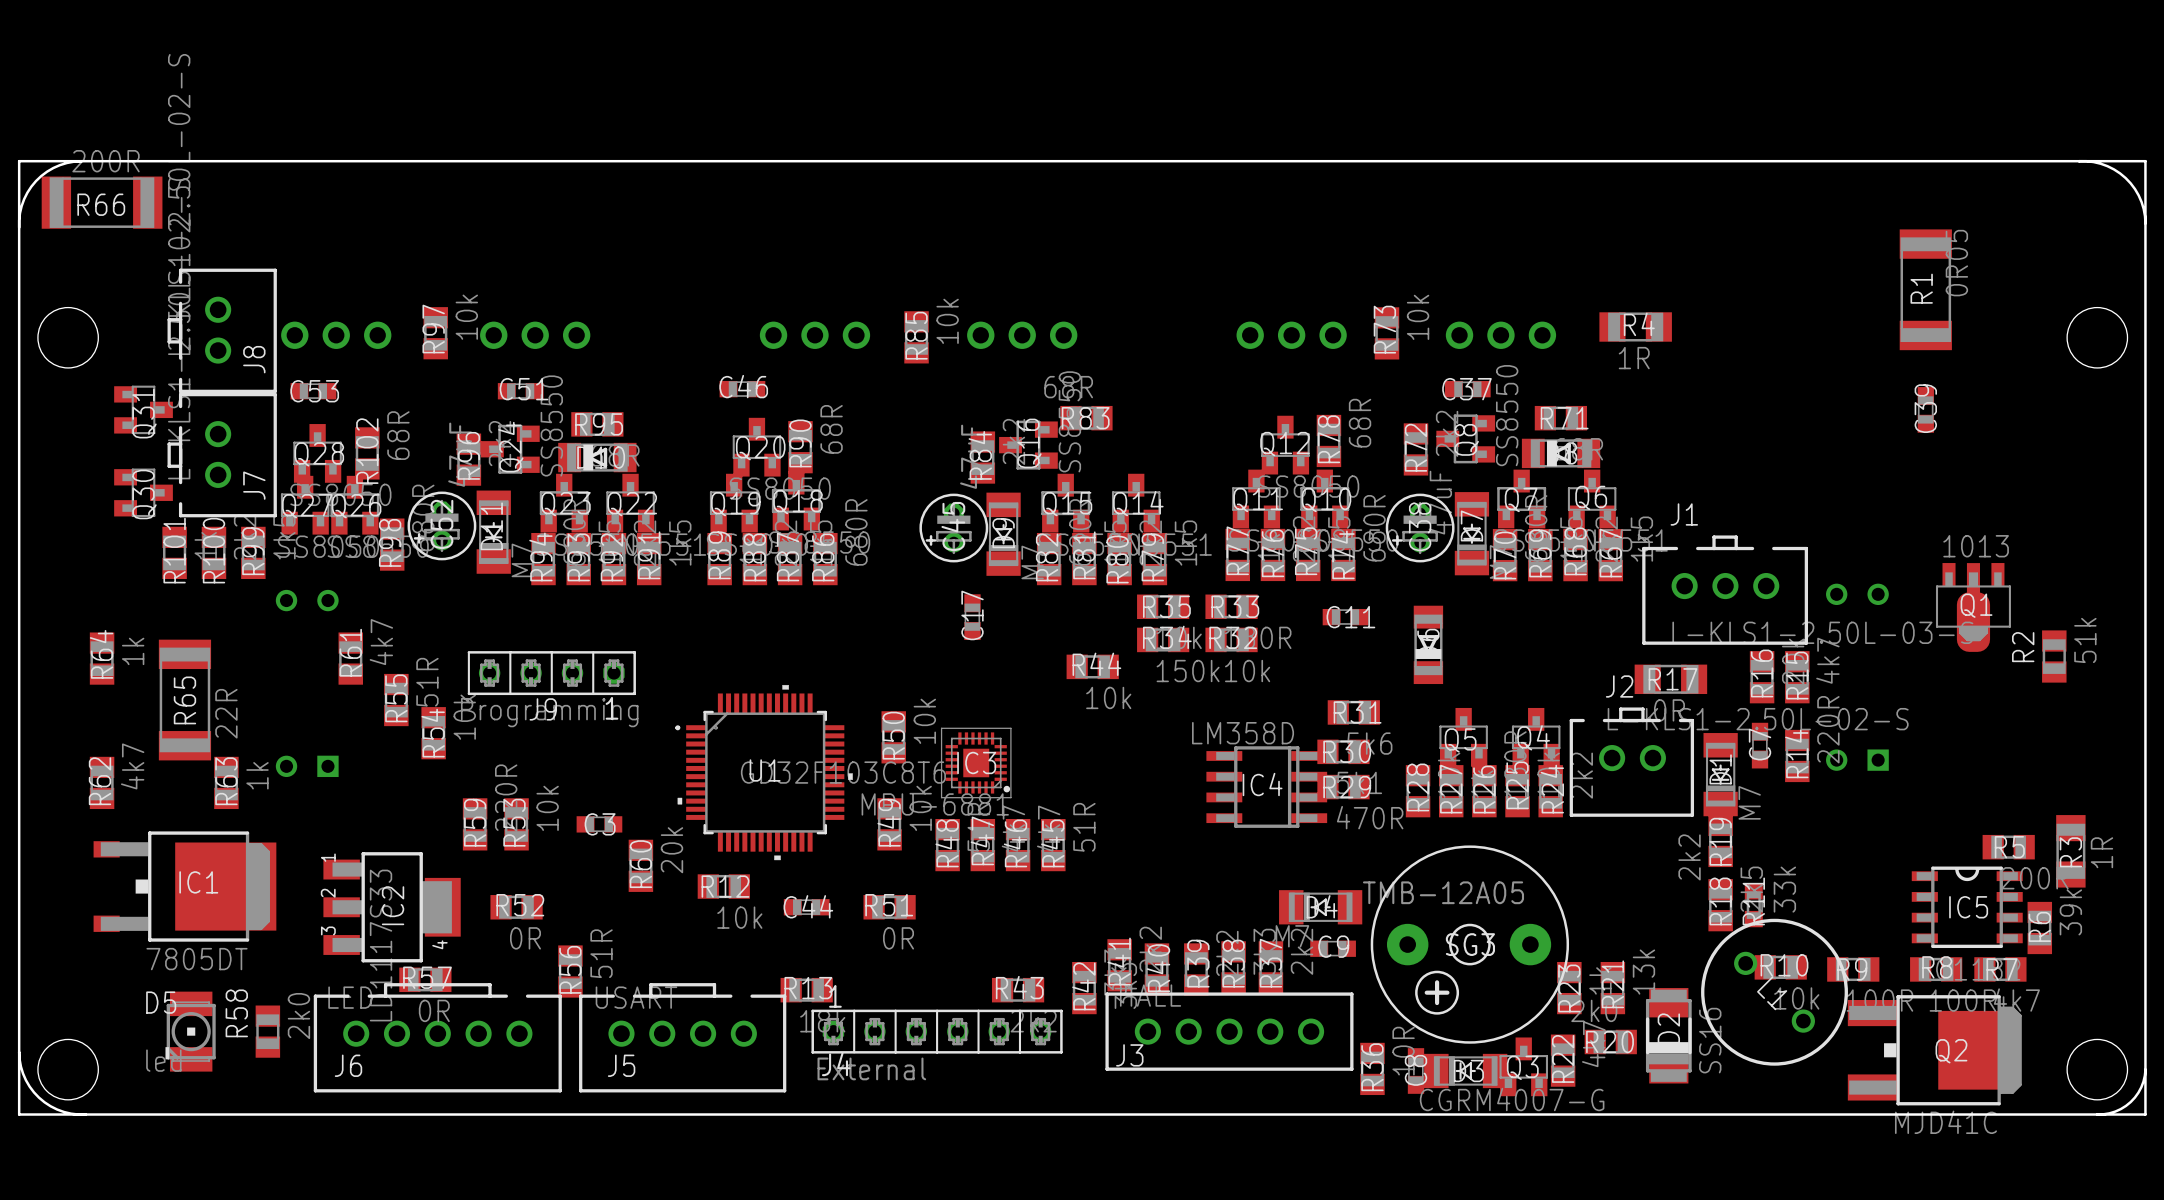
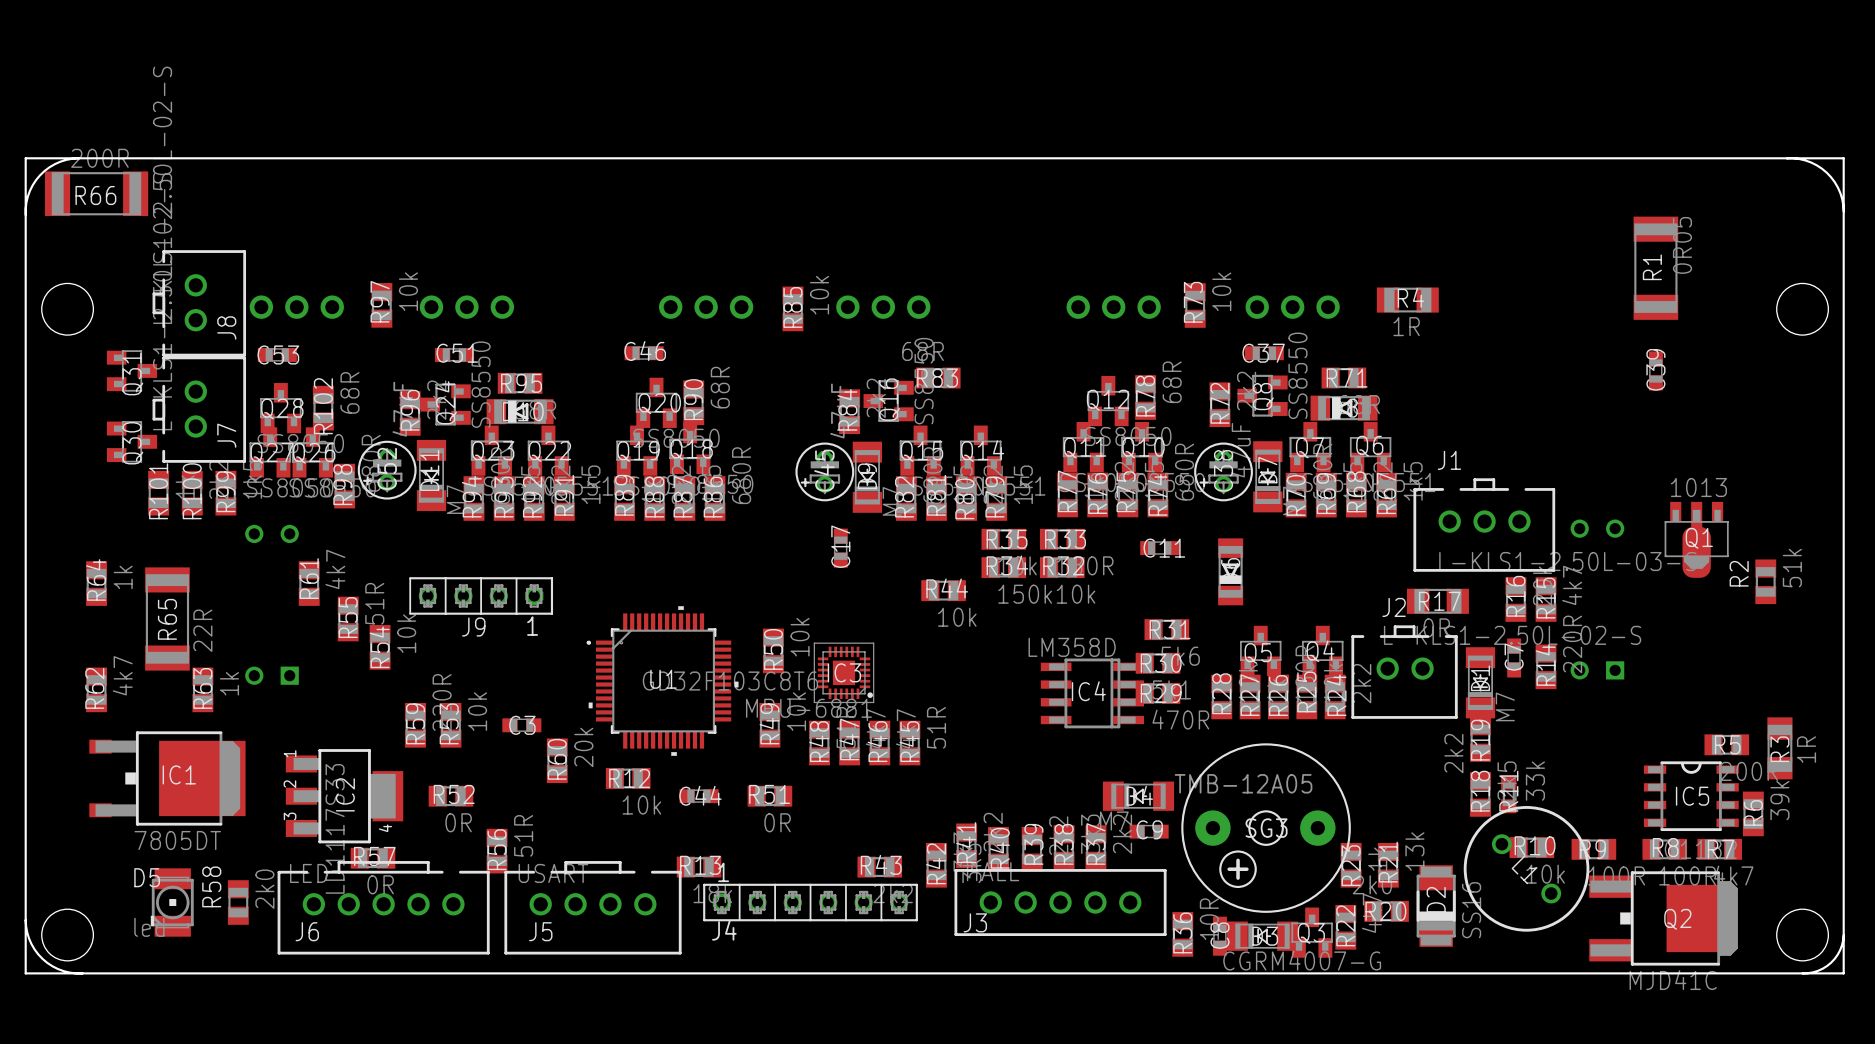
J9 value: Programming (549, 712) -> none
J4 value: External (871, 1068) -> none

